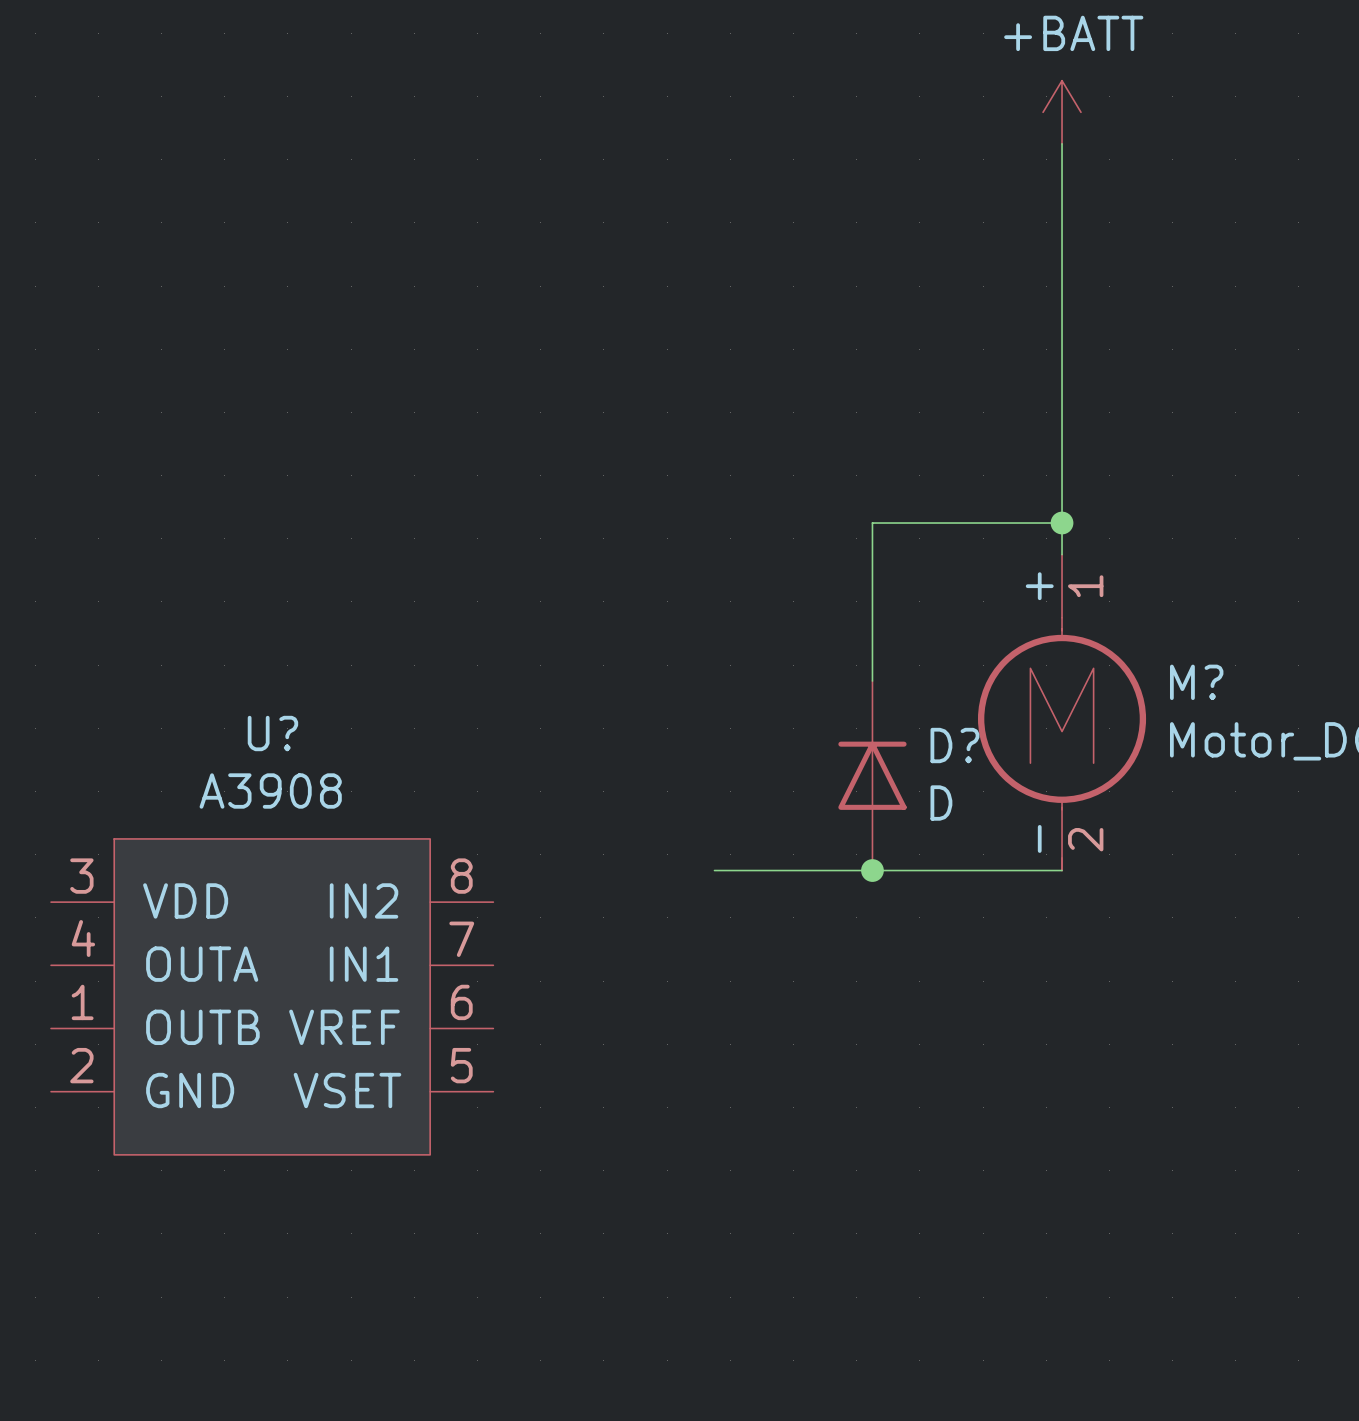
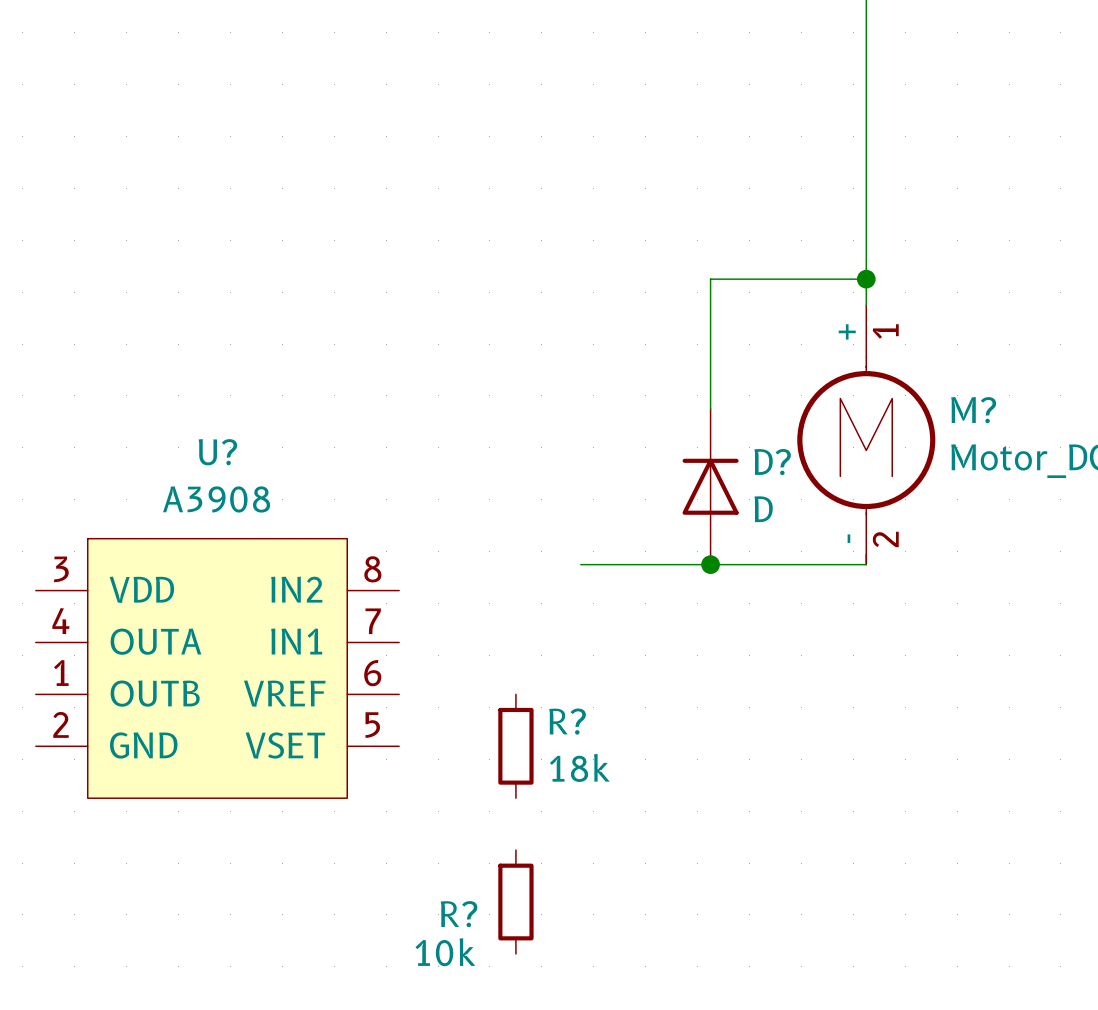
R?: none -> 18k (515, 746)
R?: none -> 10k (515, 902)

